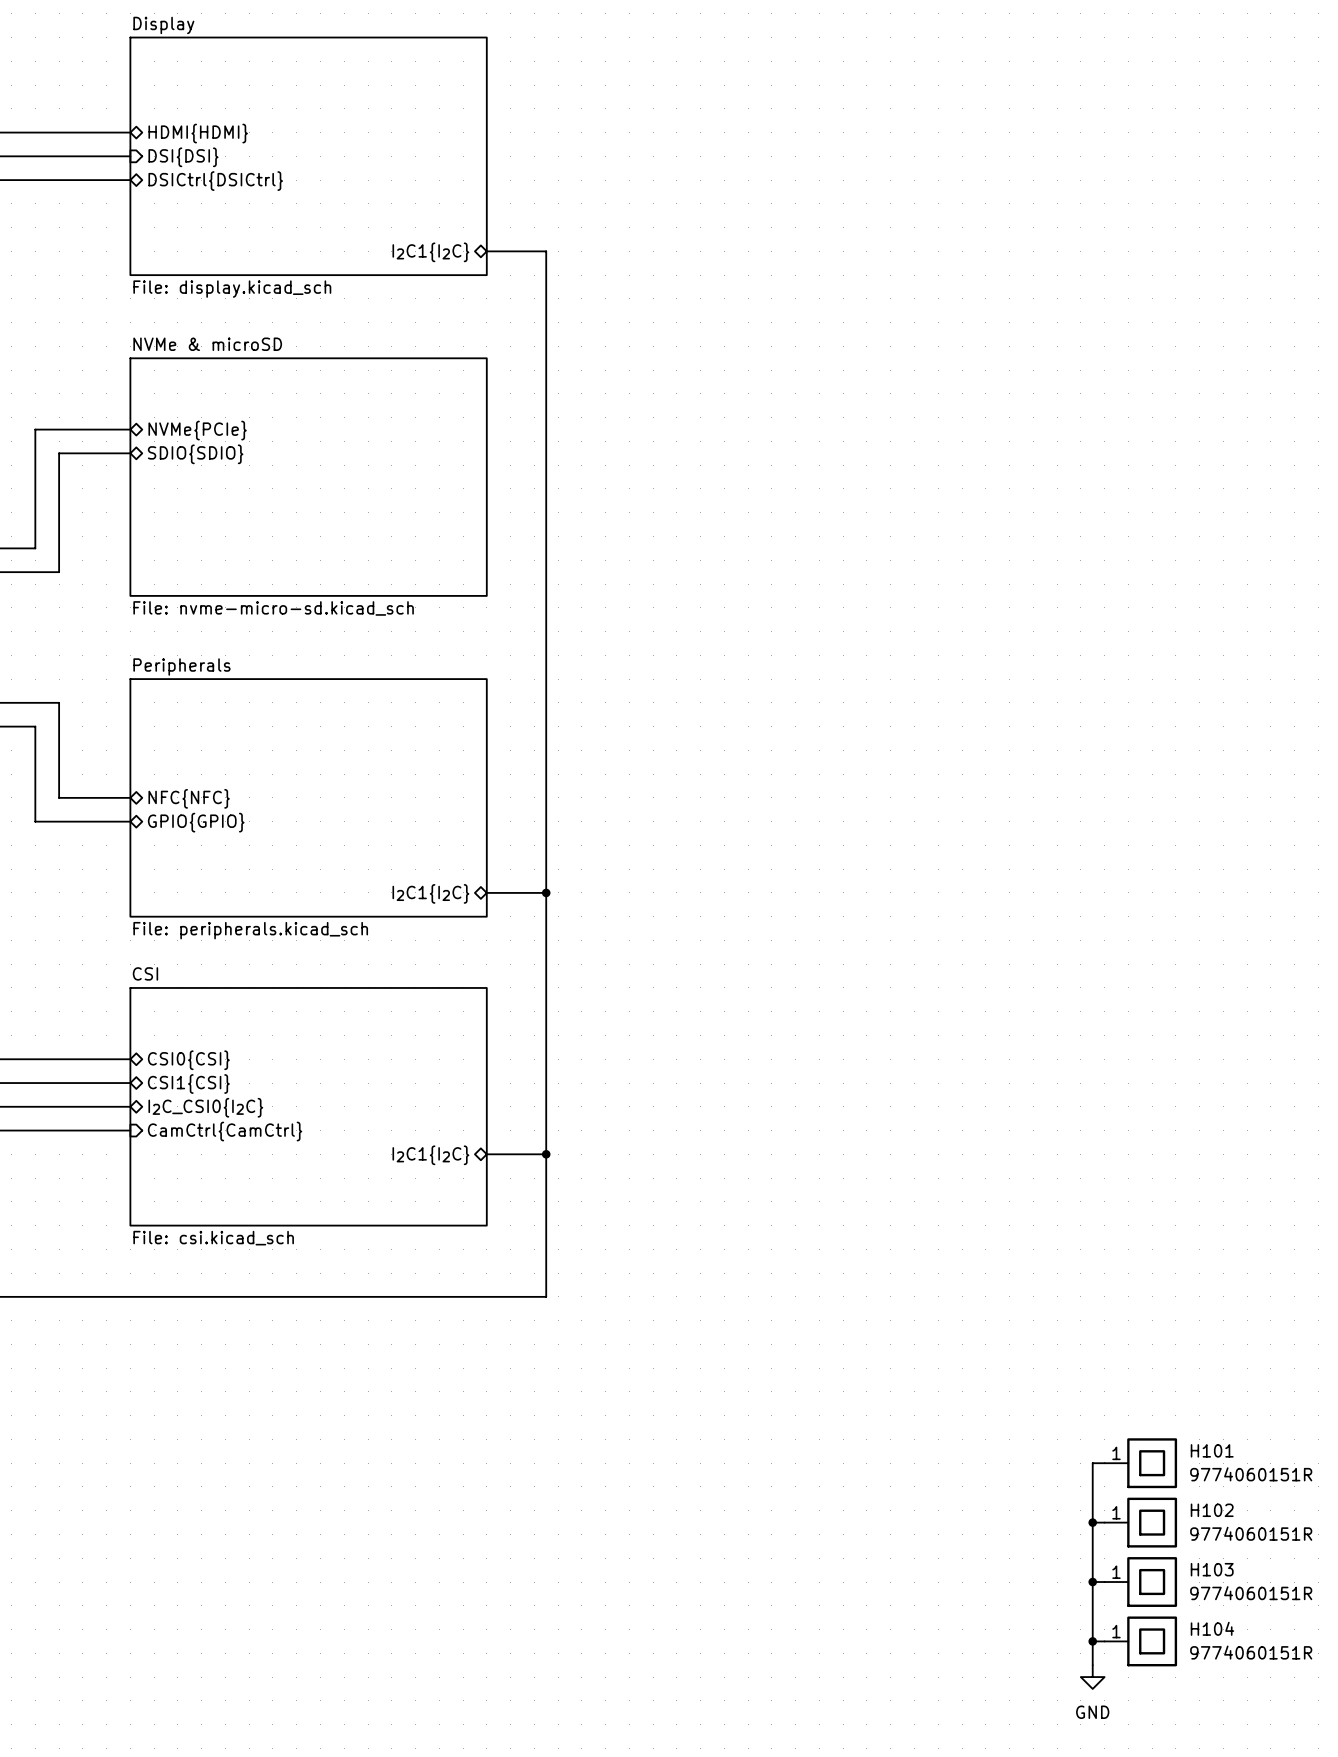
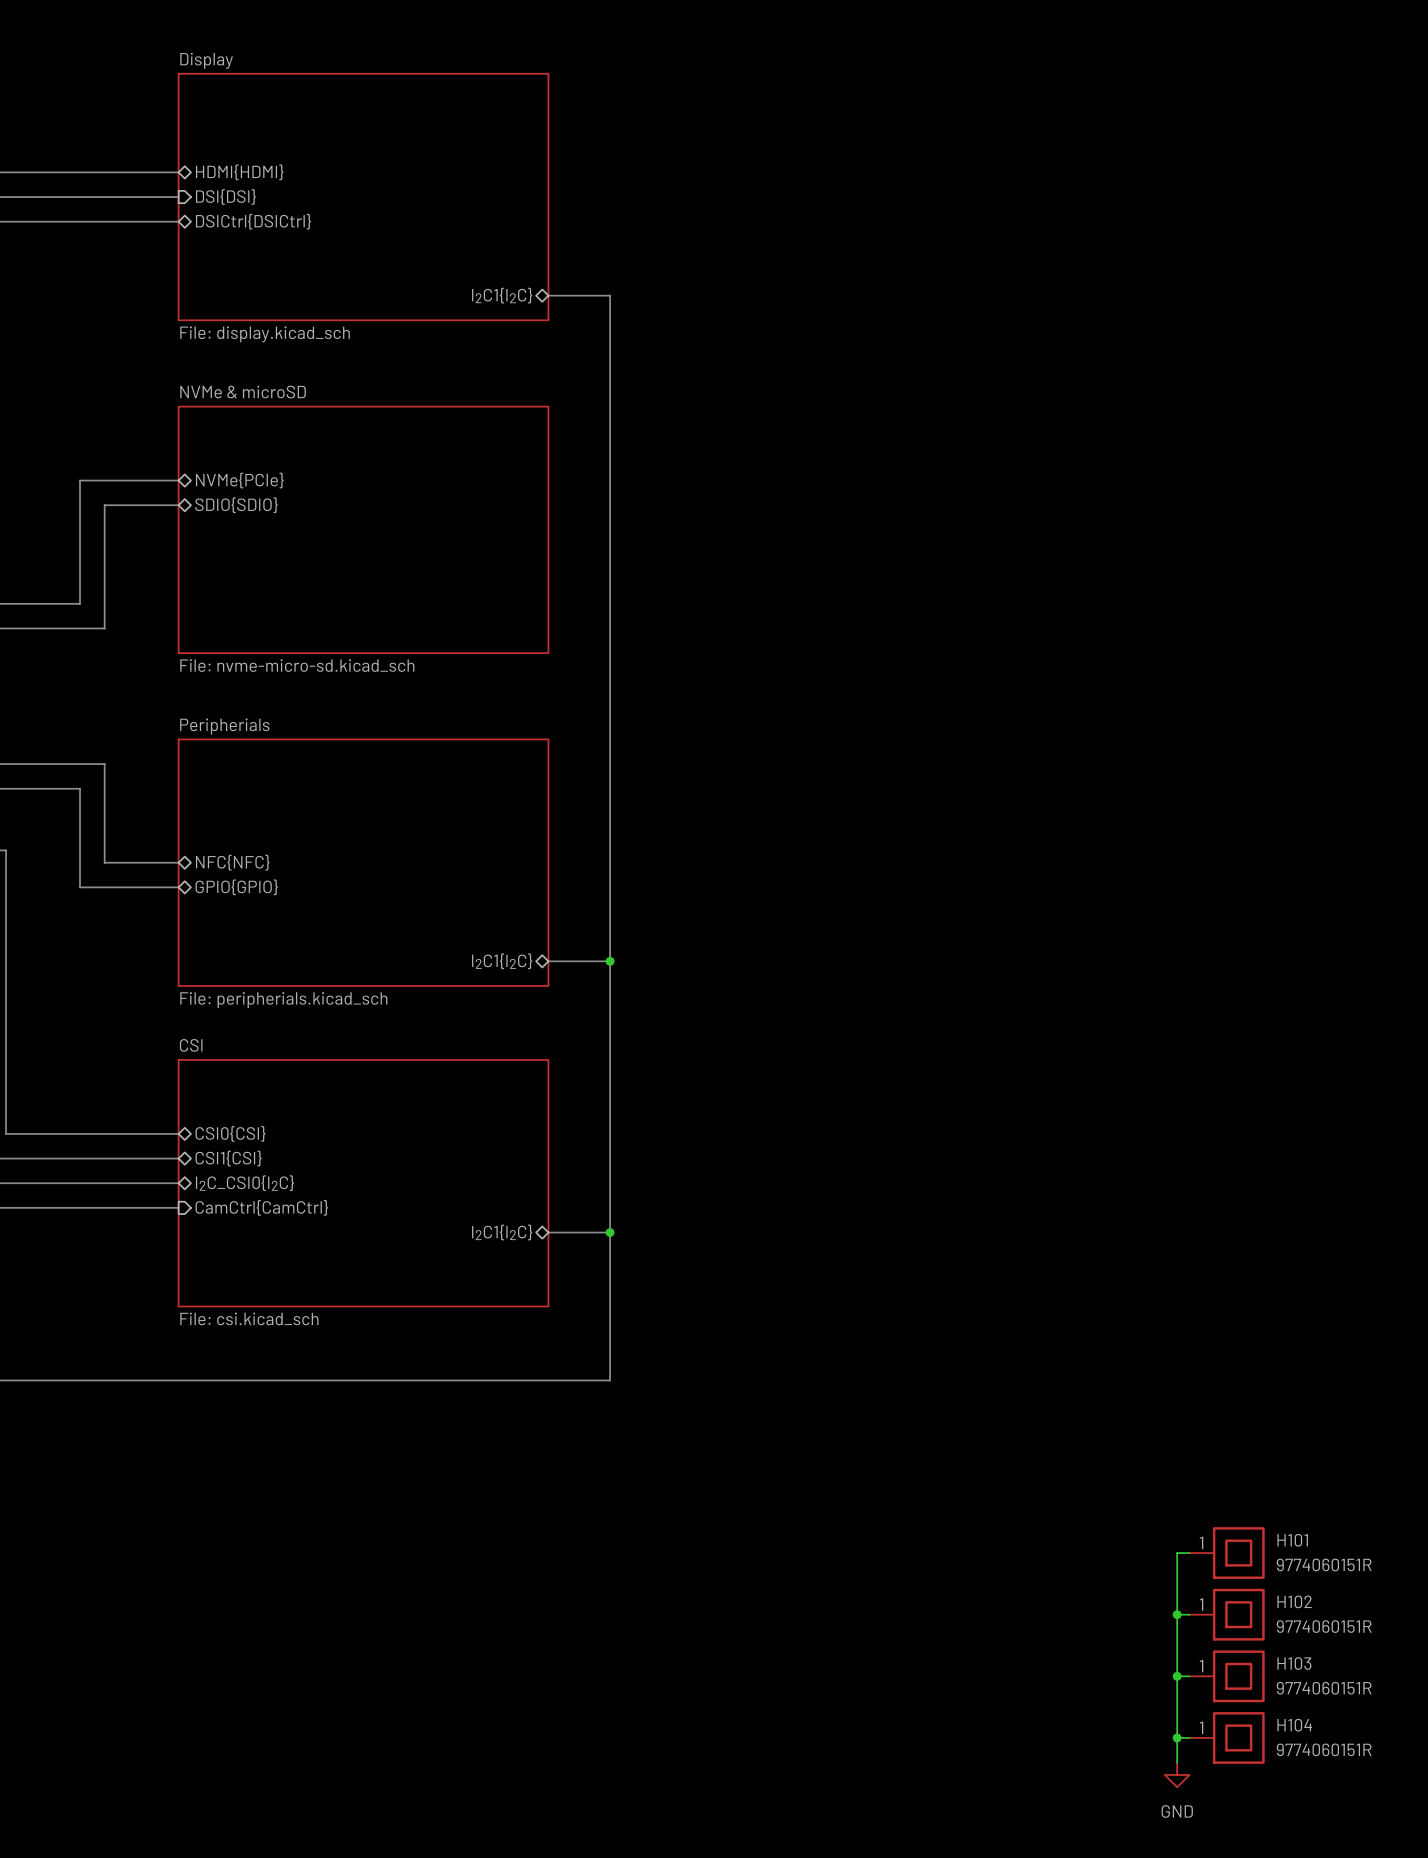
sheet Peripherals name: Peripherals (181, 667) -> Peripherials (224, 726)
sheet Peripherals value: File: peripherals.kicad_sch (250, 930) -> File: peripherials.kicad_sch (283, 1000)

